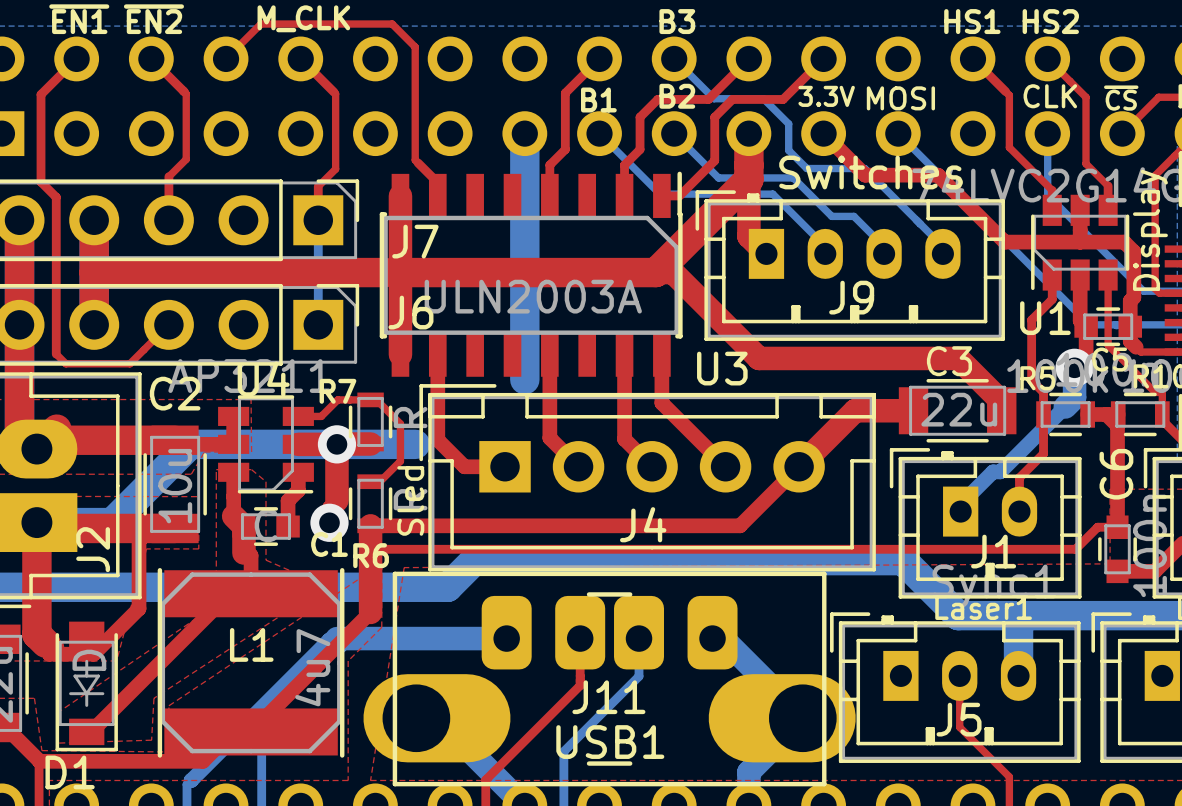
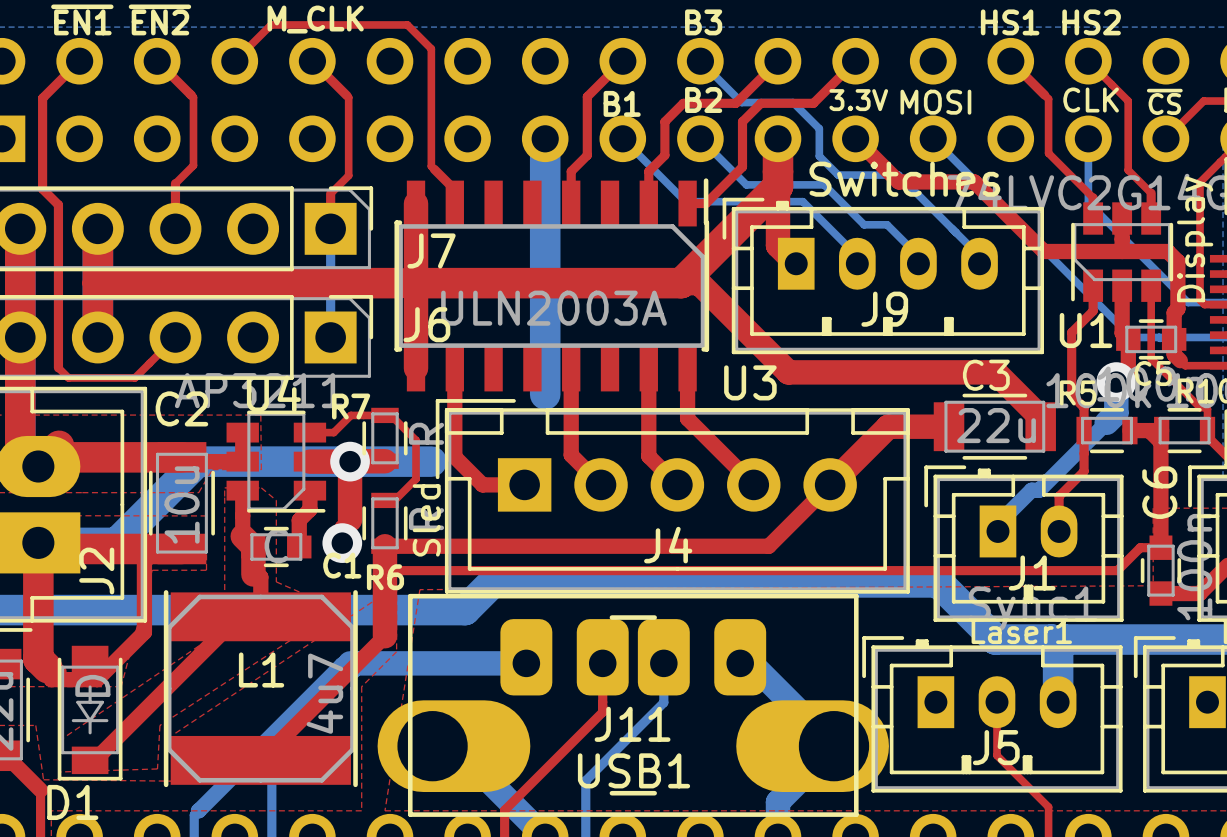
top track: (232, 731) (203, 761) (39, 760) -> none

